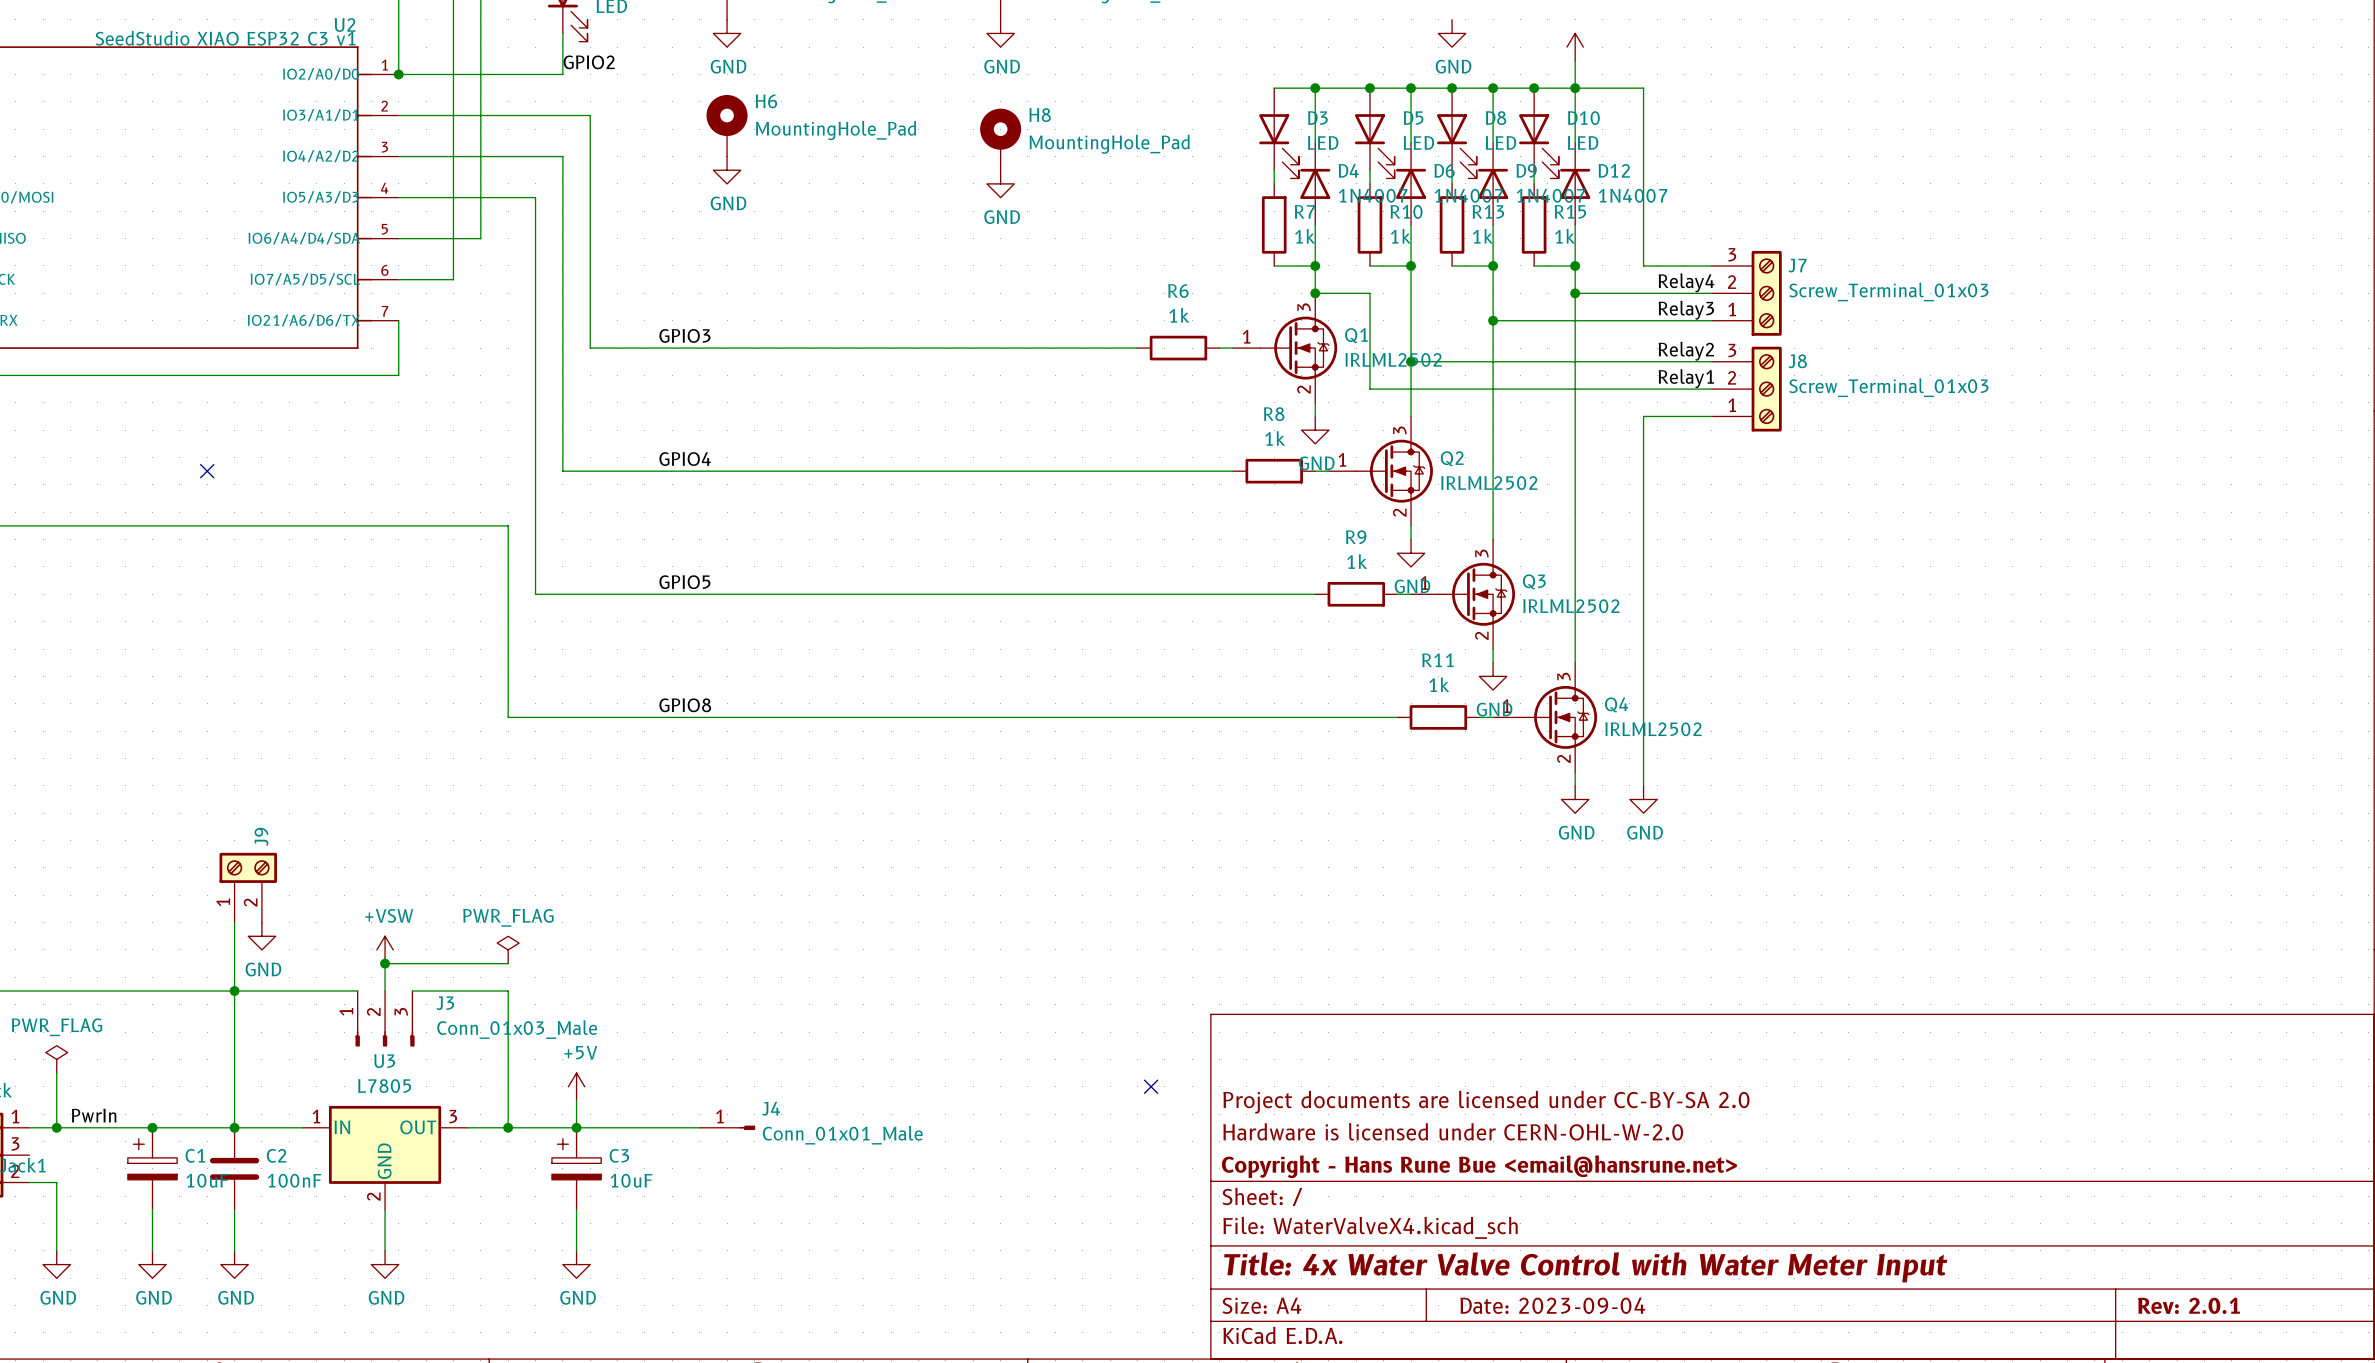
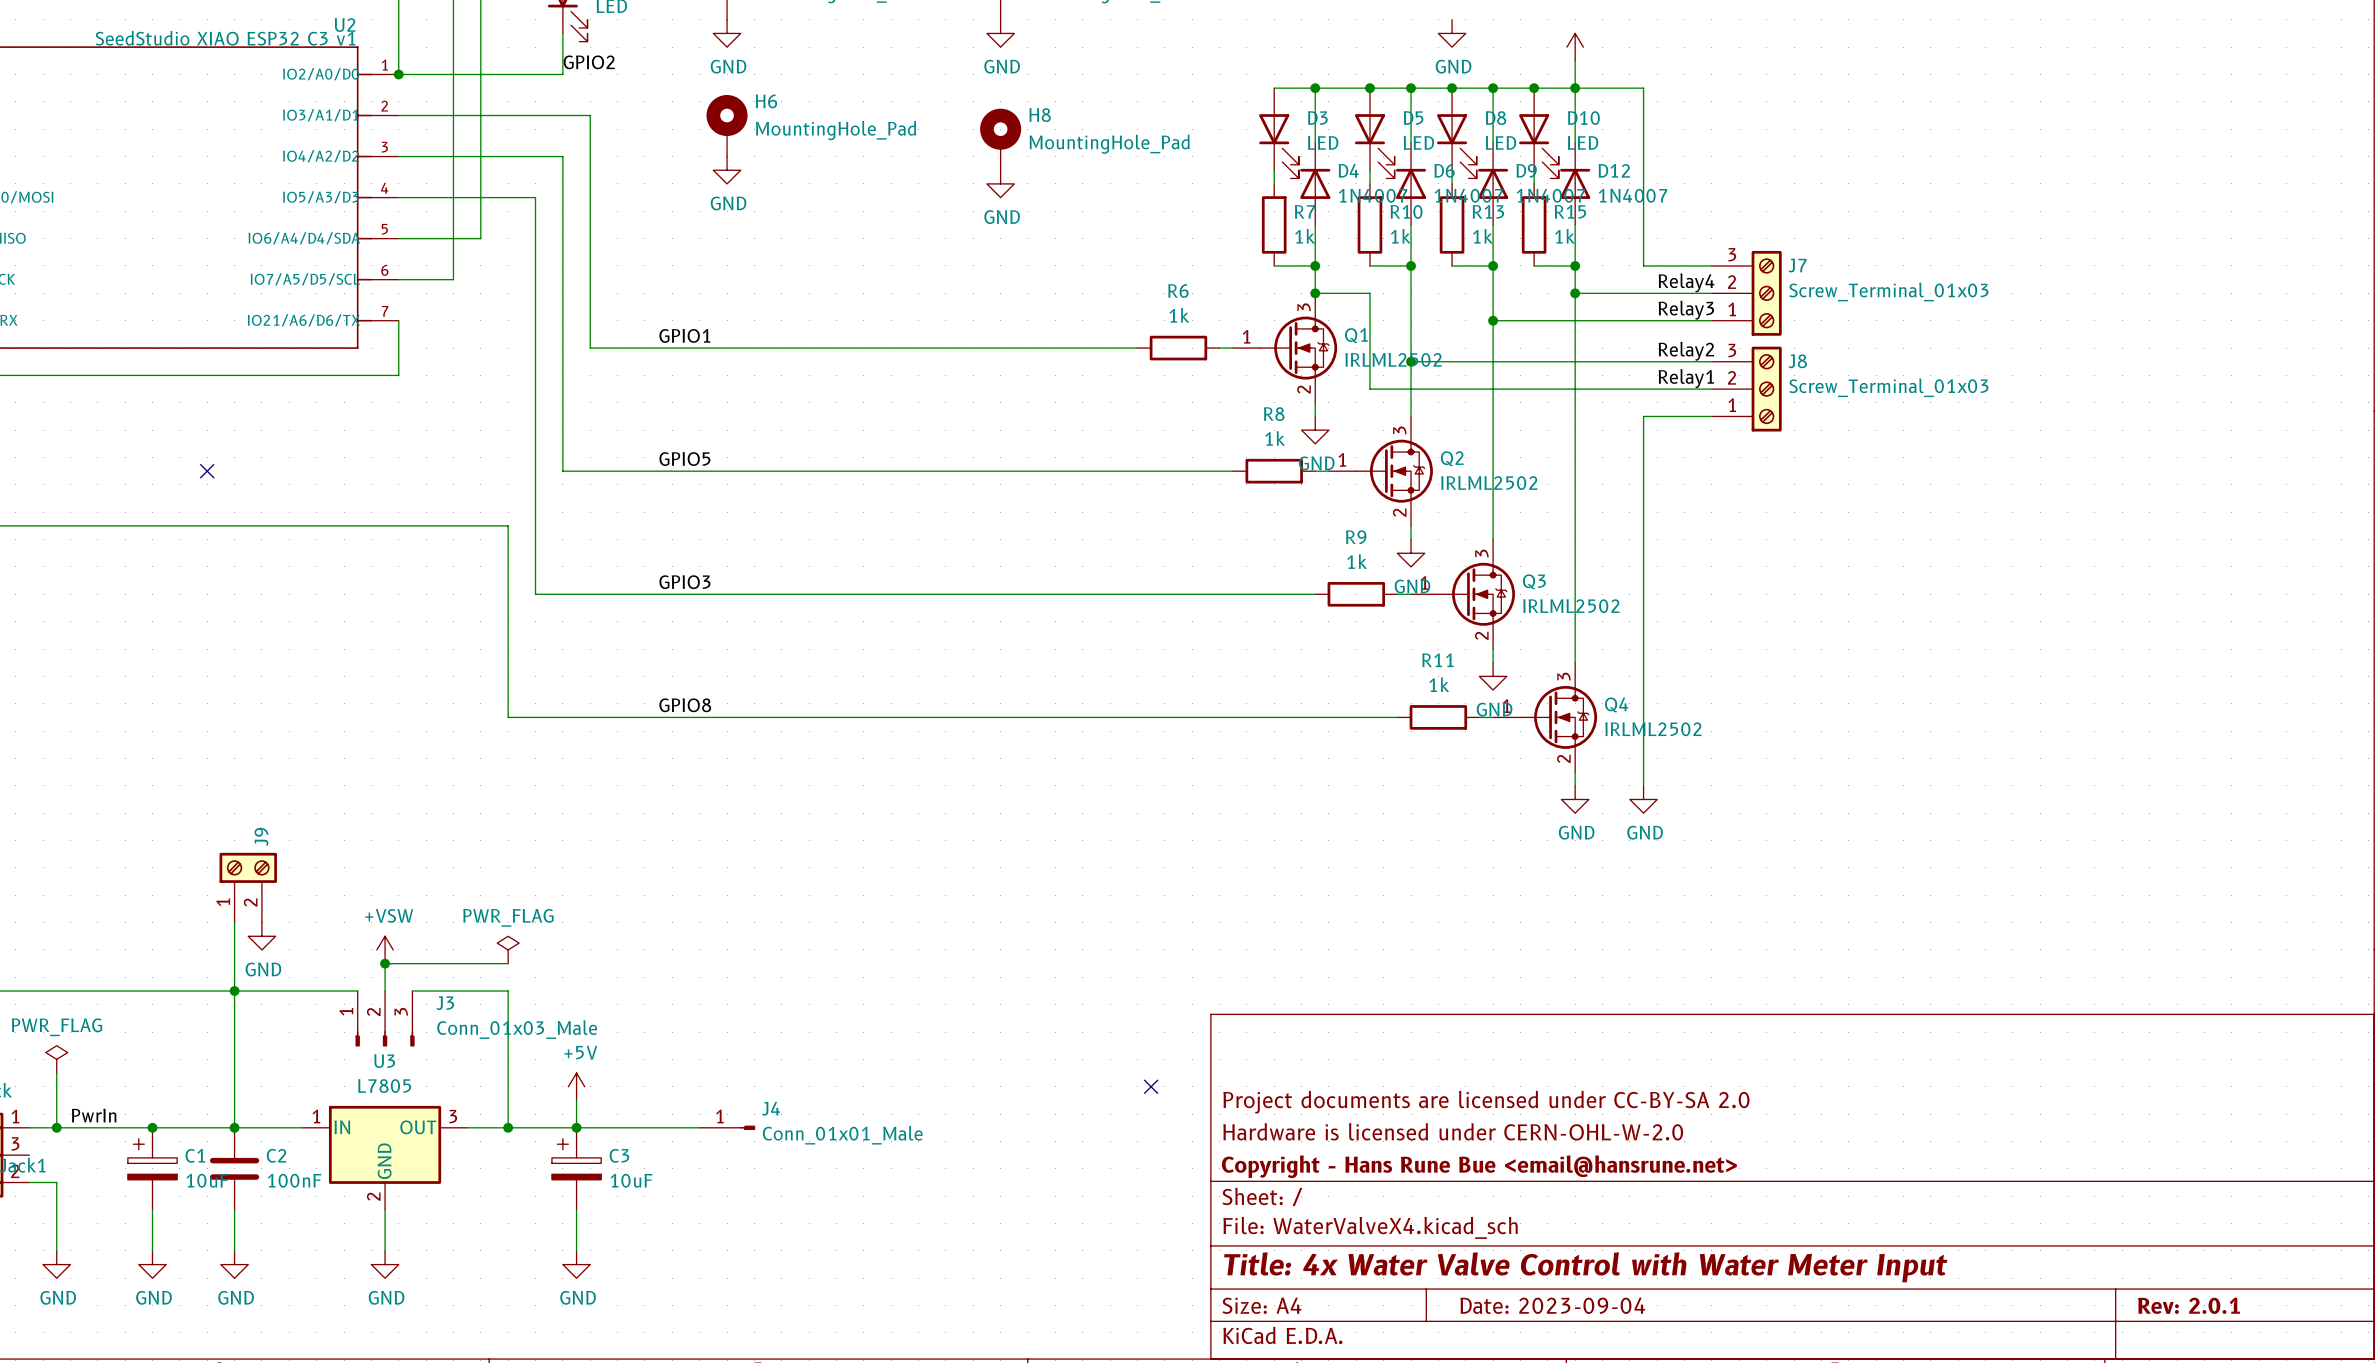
label: GPIO3 (684, 335) -> GPIO1 (684, 335)
label: GPIO4 (685, 459) -> GPIO5 (684, 459)
label: GPIO5 (684, 582) -> GPIO3 (684, 582)

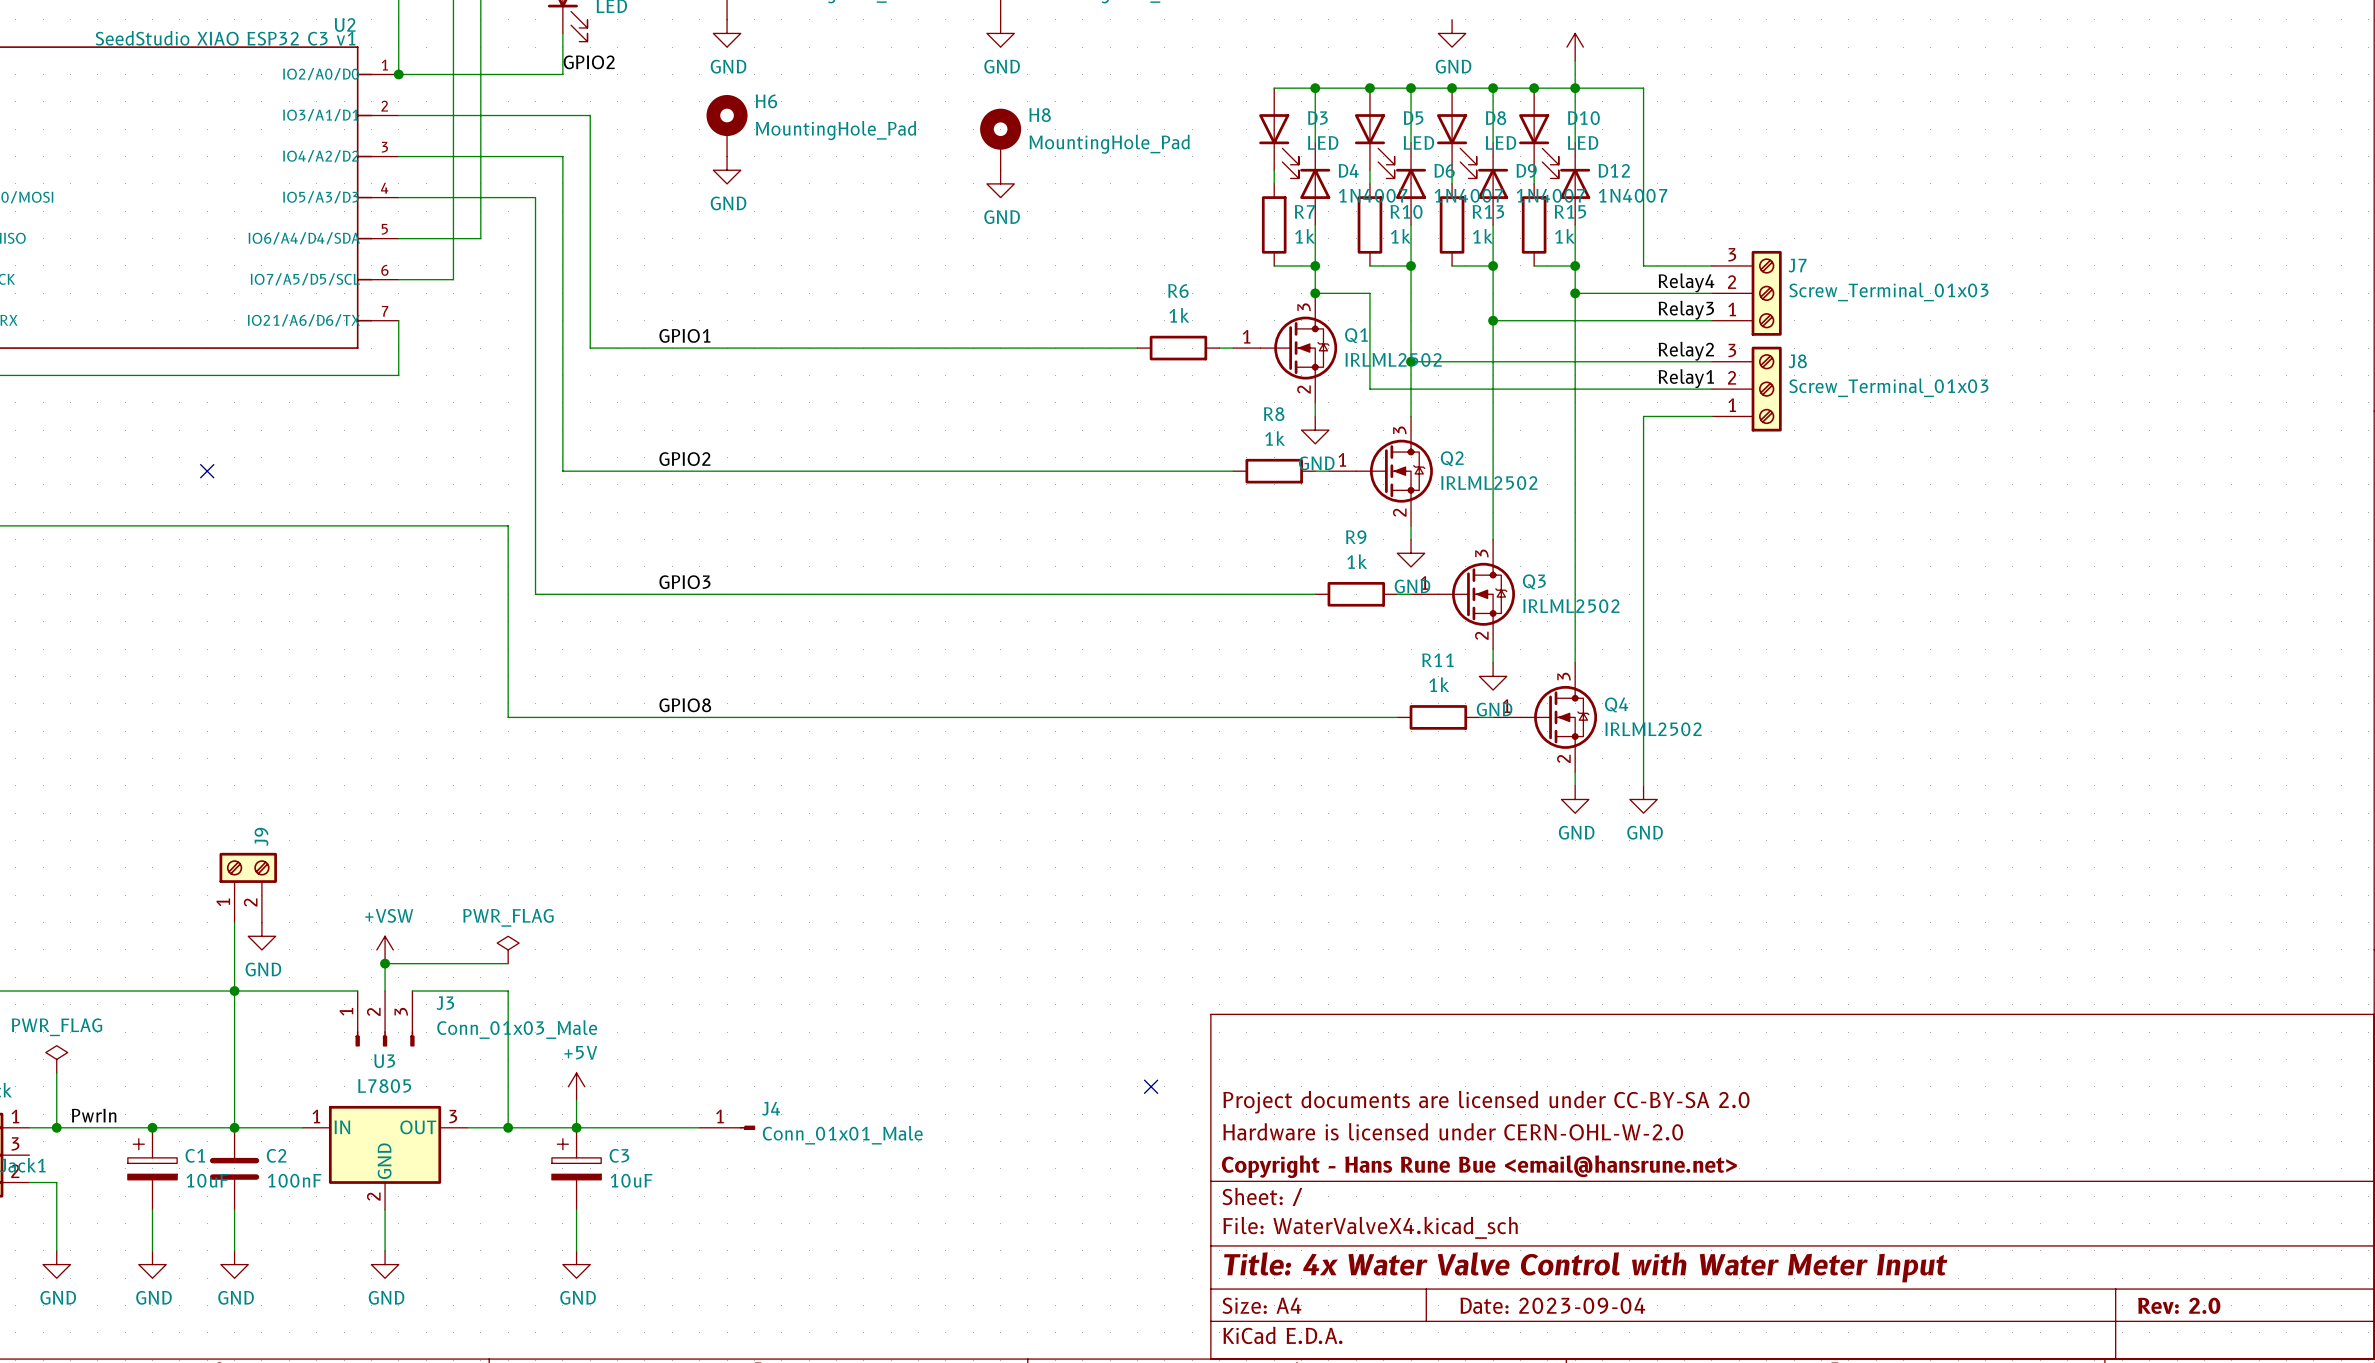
label: GPIO5 (684, 459) -> GPIO2 (684, 459)
title block: Rev: 2.0.1 (2189, 1305) -> Rev: 2.0 (2179, 1305)

